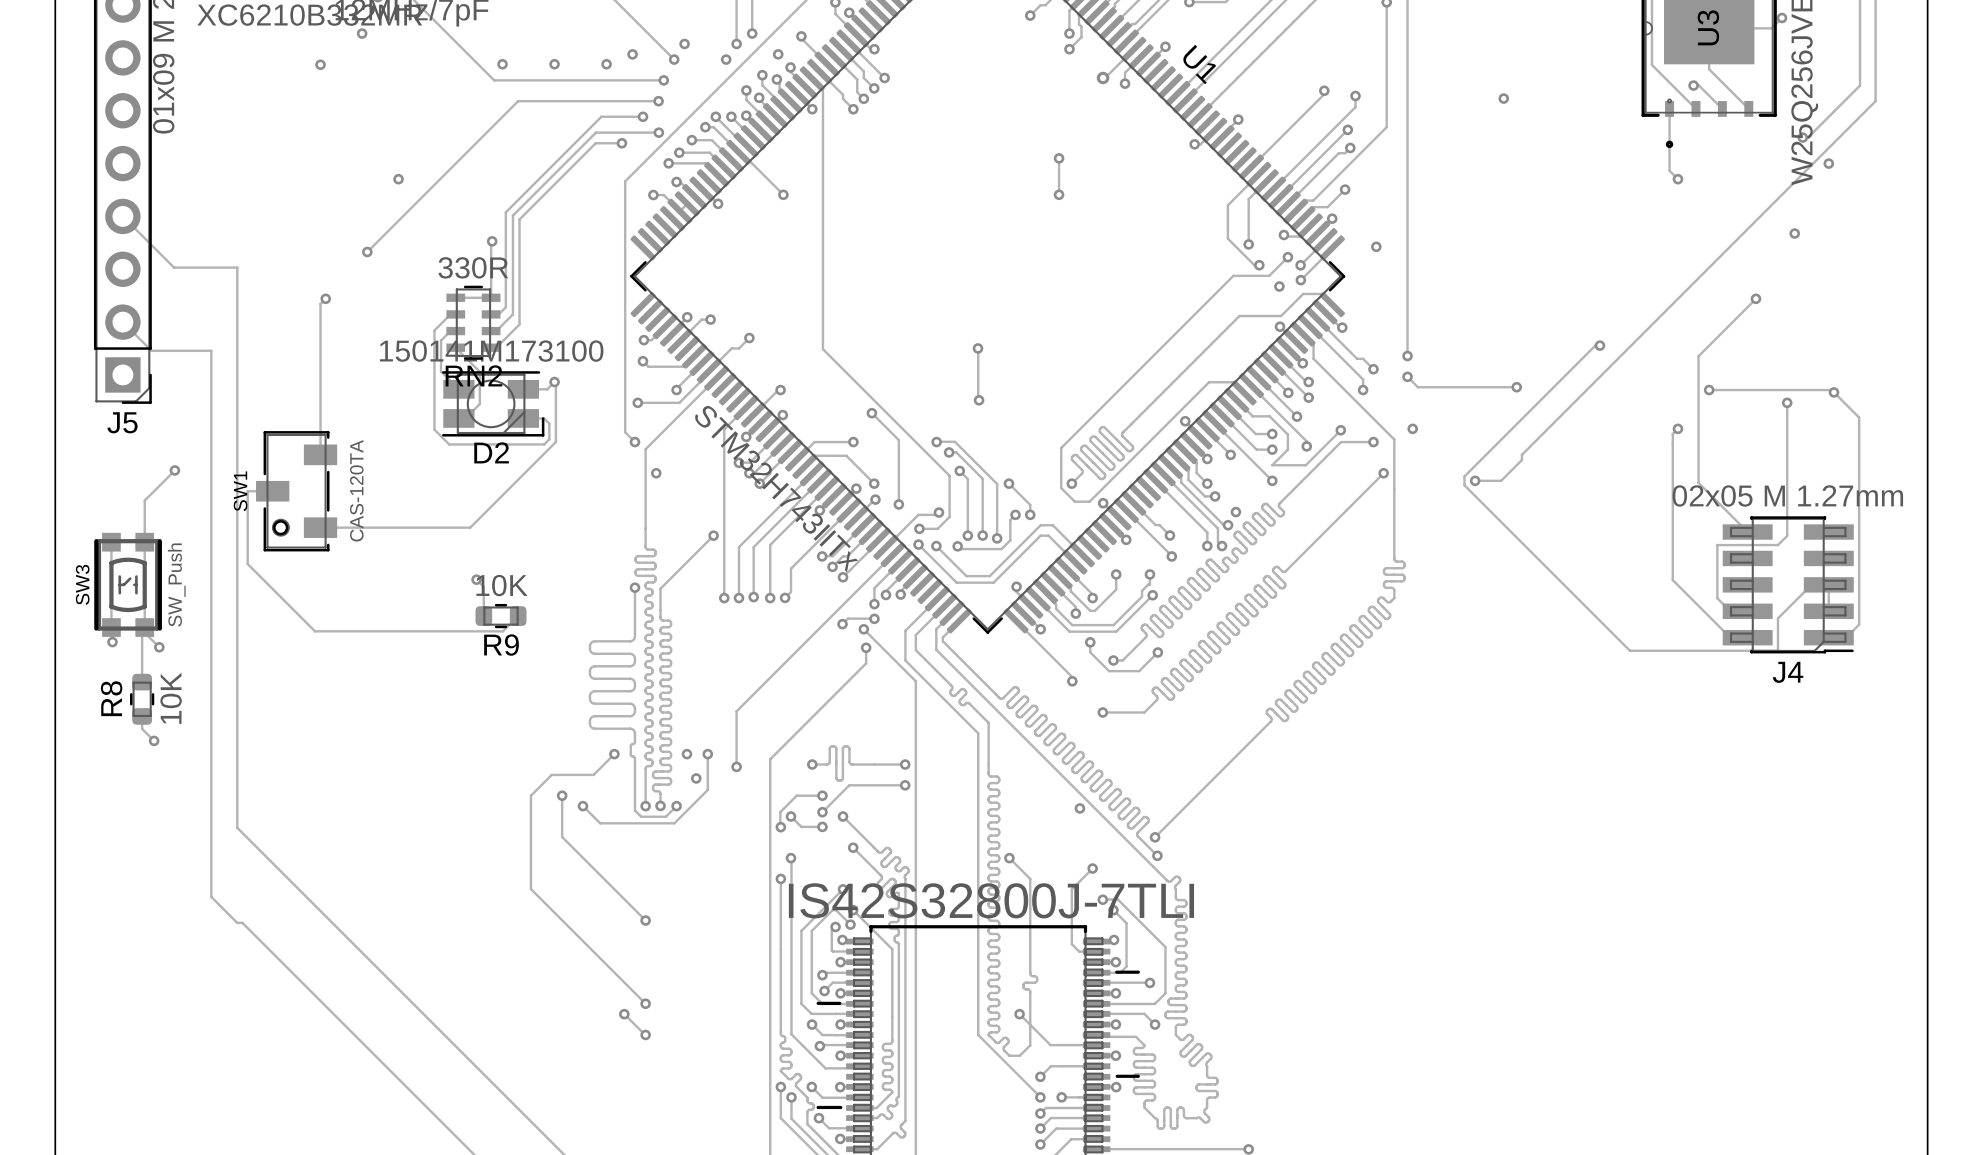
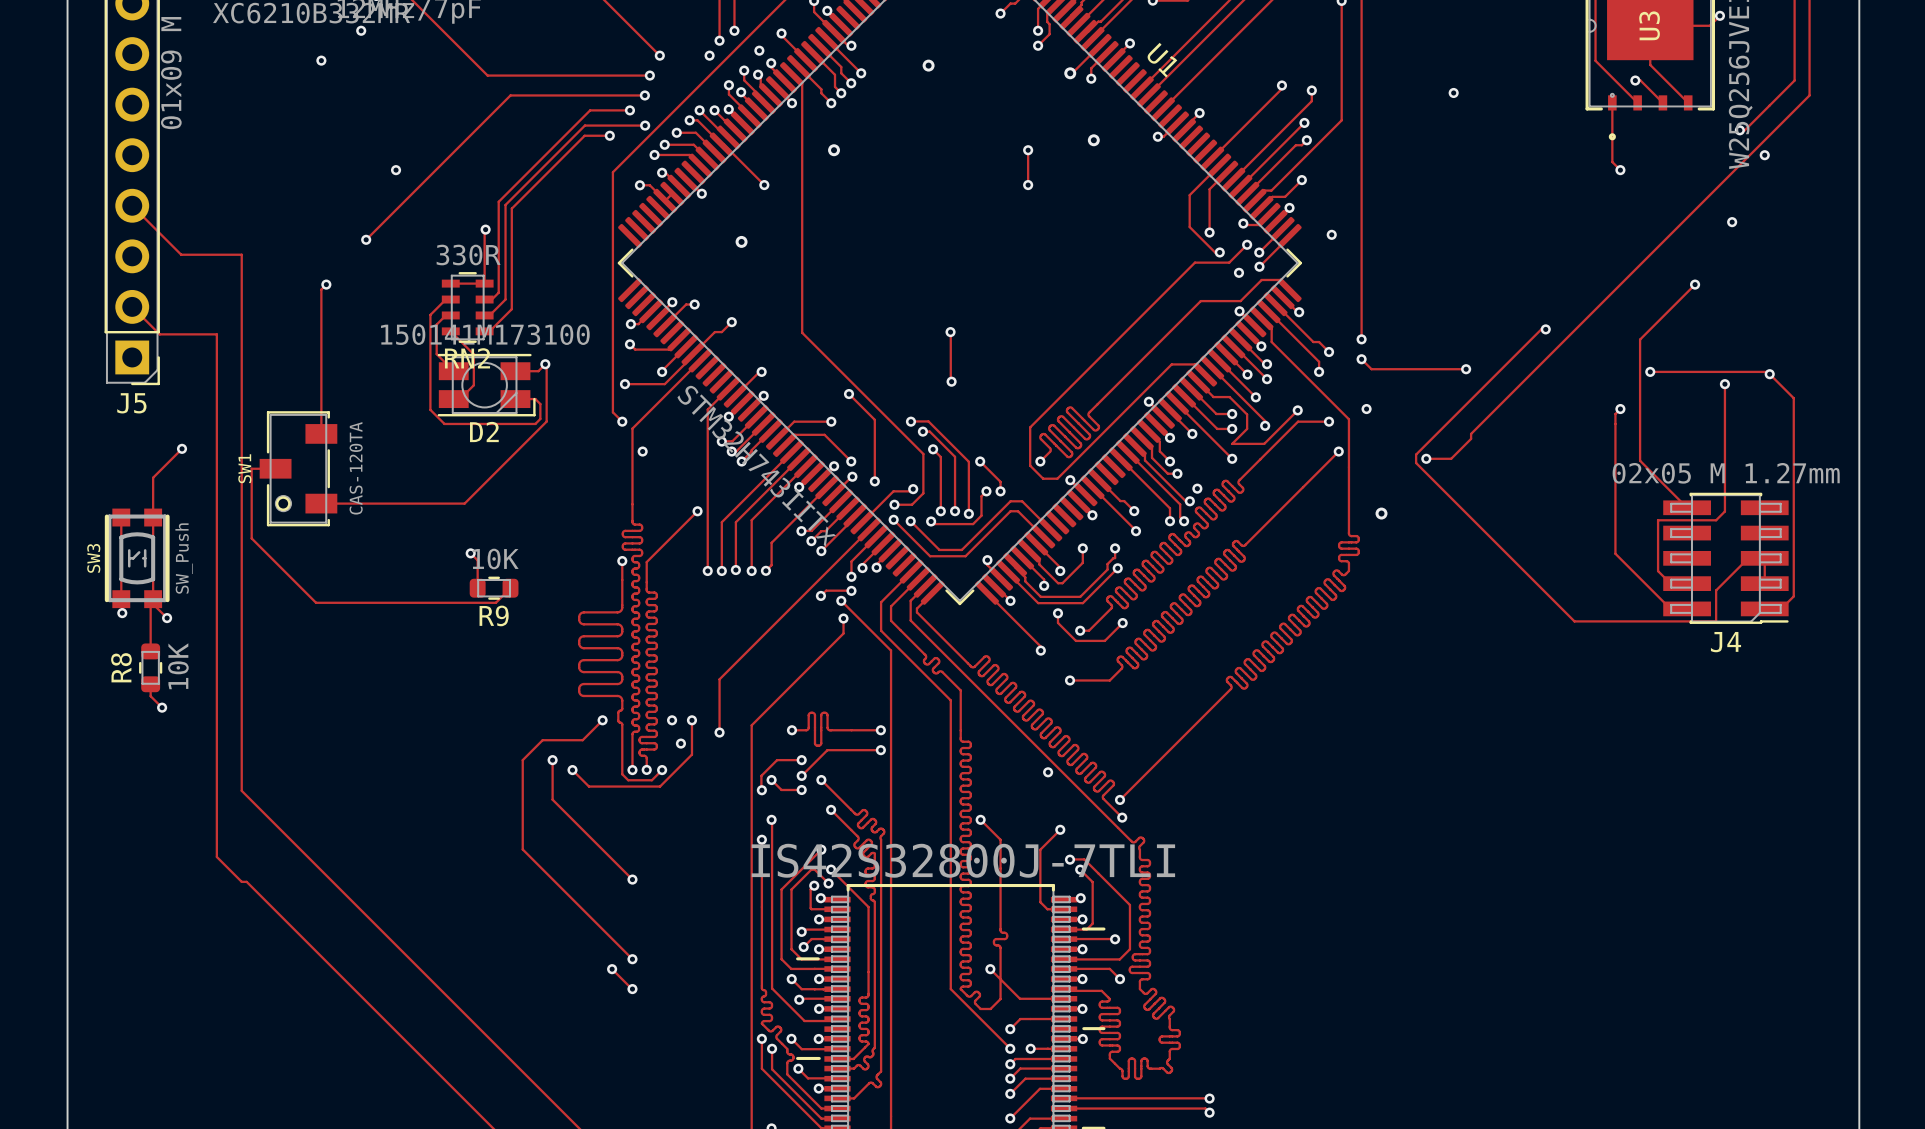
via: (684, 43) -> none
via: (632, 54) -> none
via: (502, 64) -> none
via: (554, 64) -> none
via: (606, 64) -> none
via: none -> (928, 65)
via: none -> (1093, 140)
via: none -> (834, 150)
via: none -> (741, 241)
via: none -> (1381, 513)

